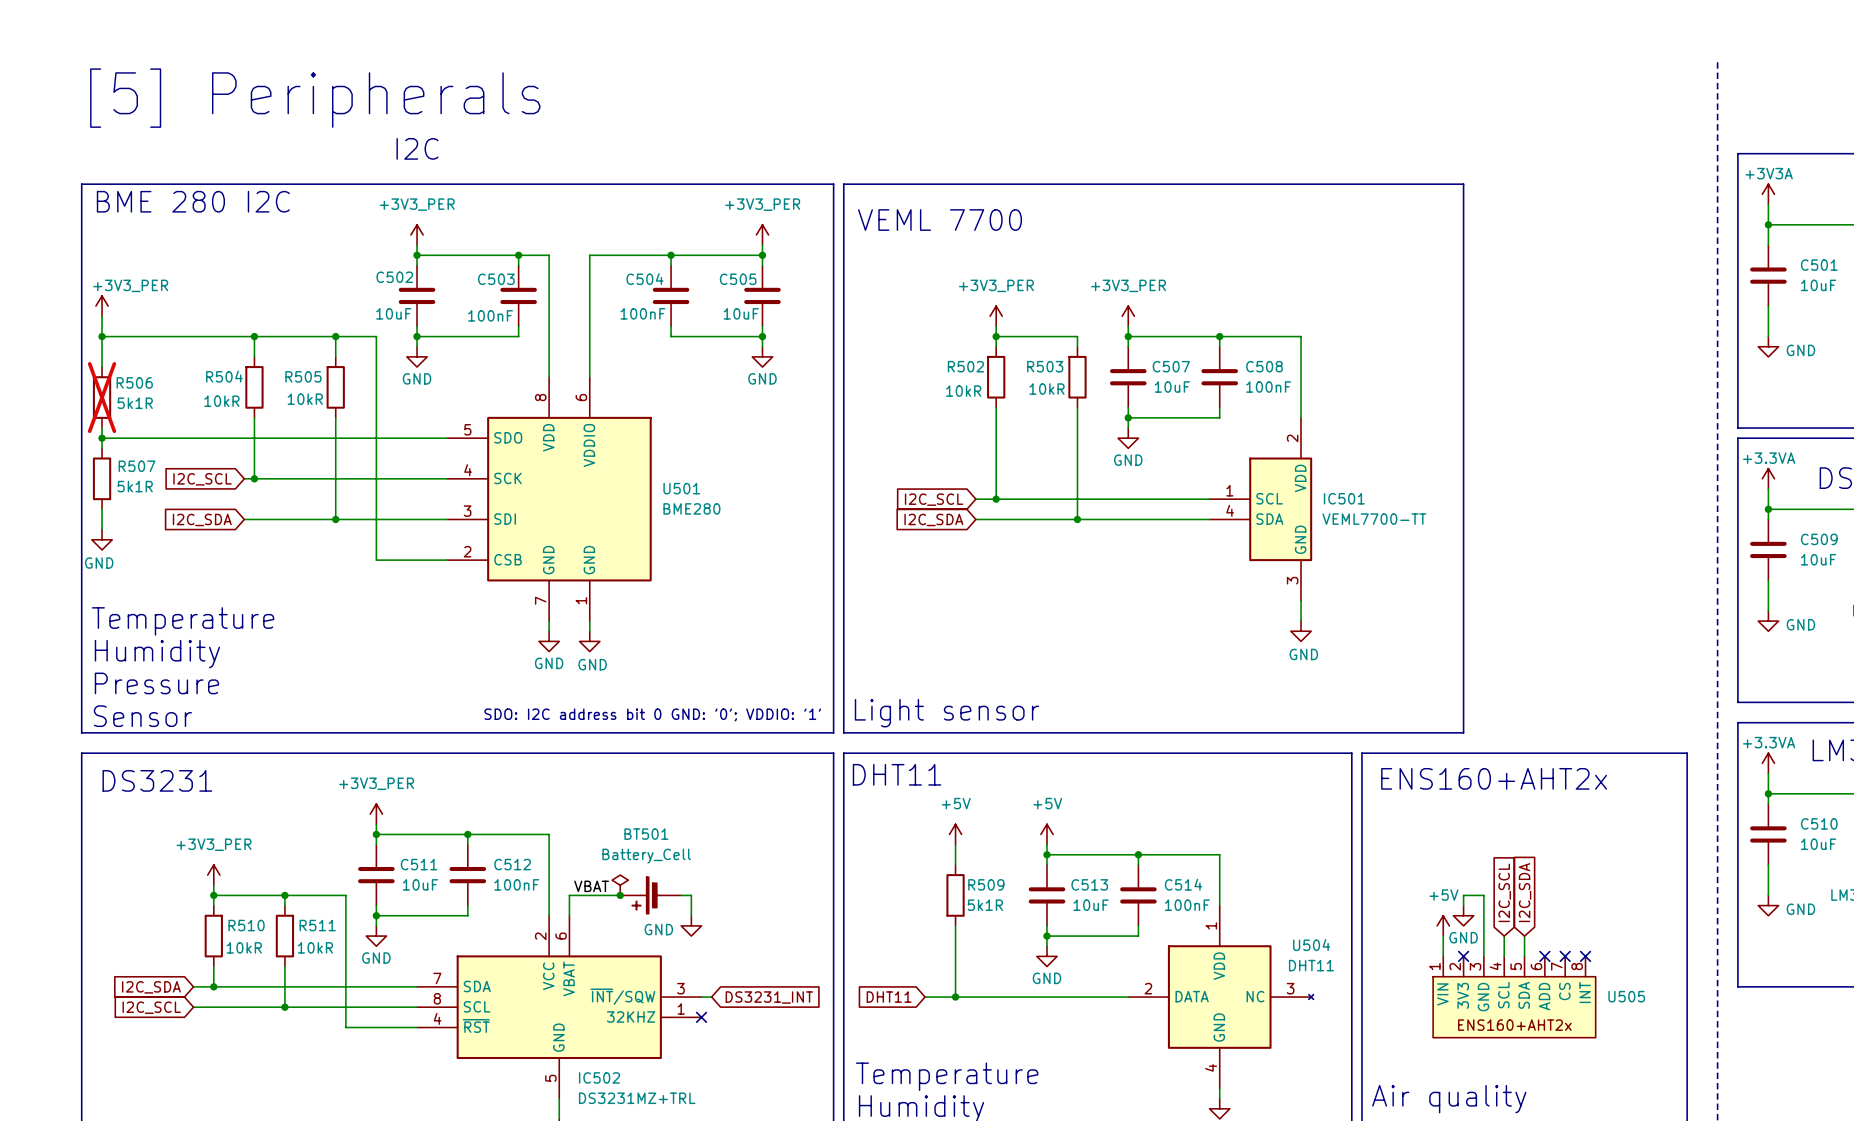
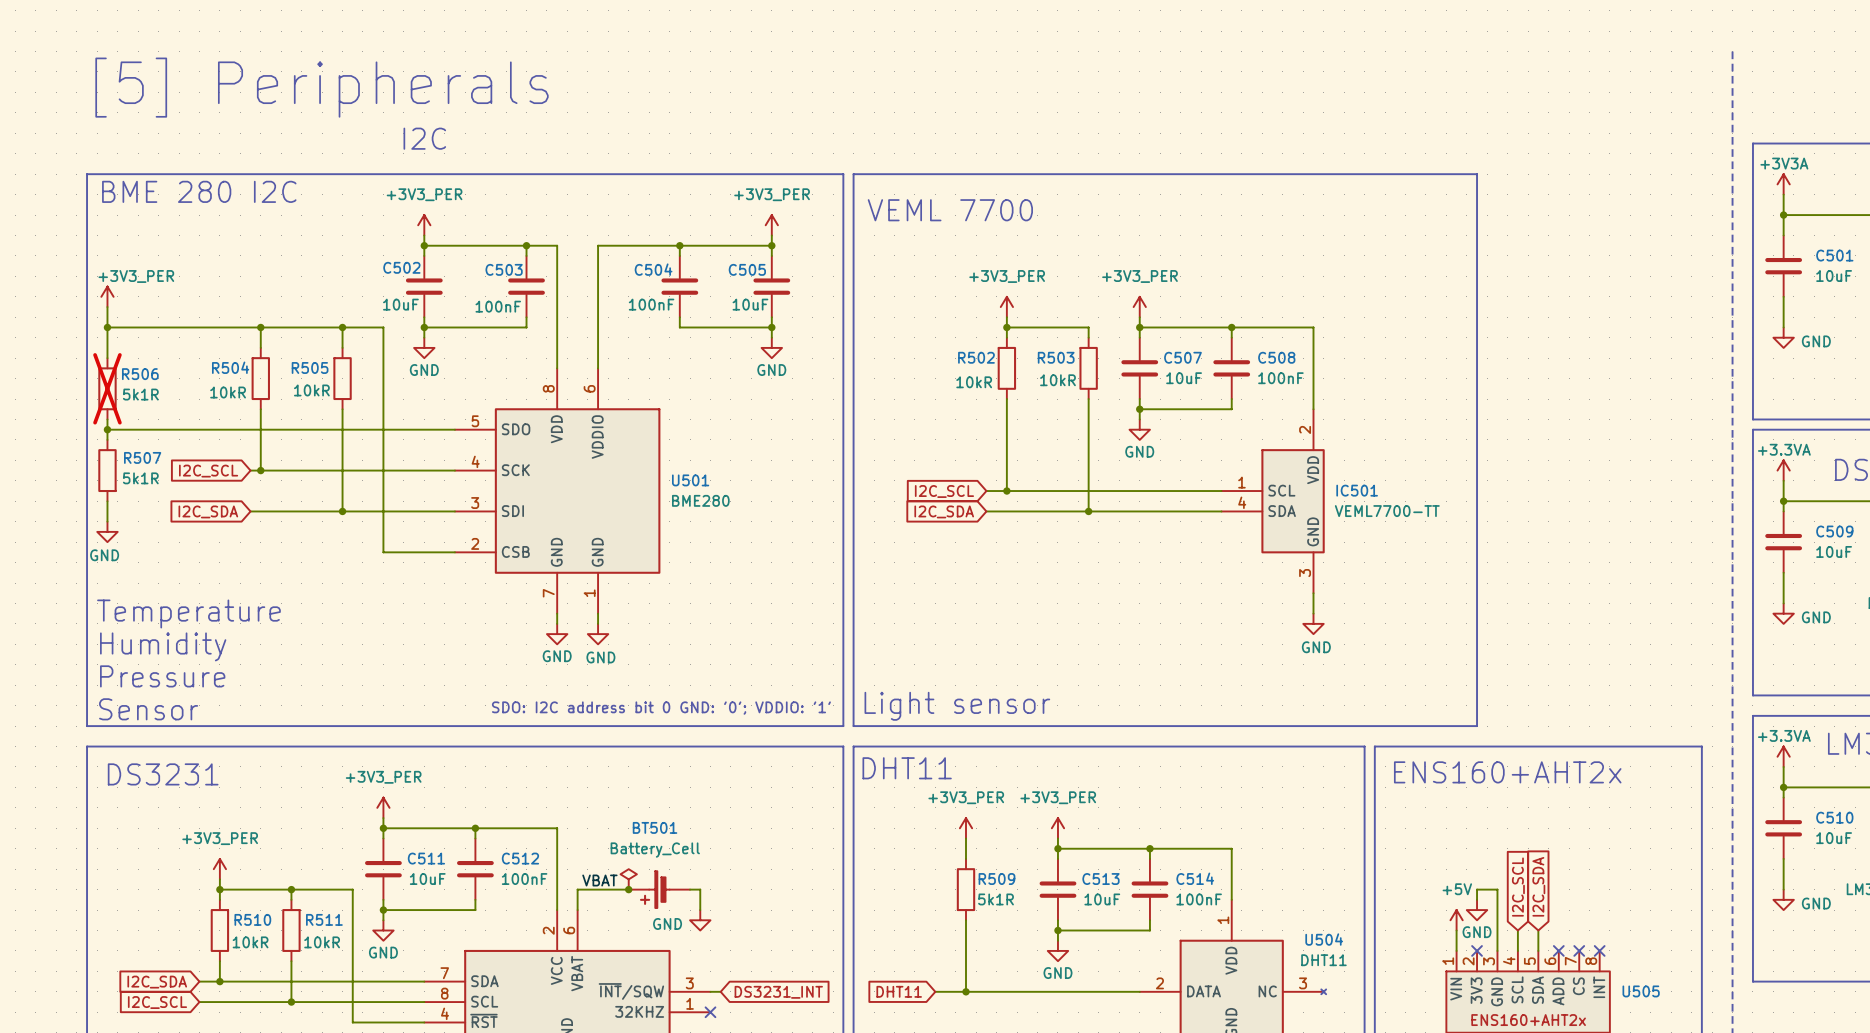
power symbol: +5V (955, 834) -> +3V3_PER (966, 828)
power symbol: +5V (1046, 834) -> +3V3_PER (1057, 828)

